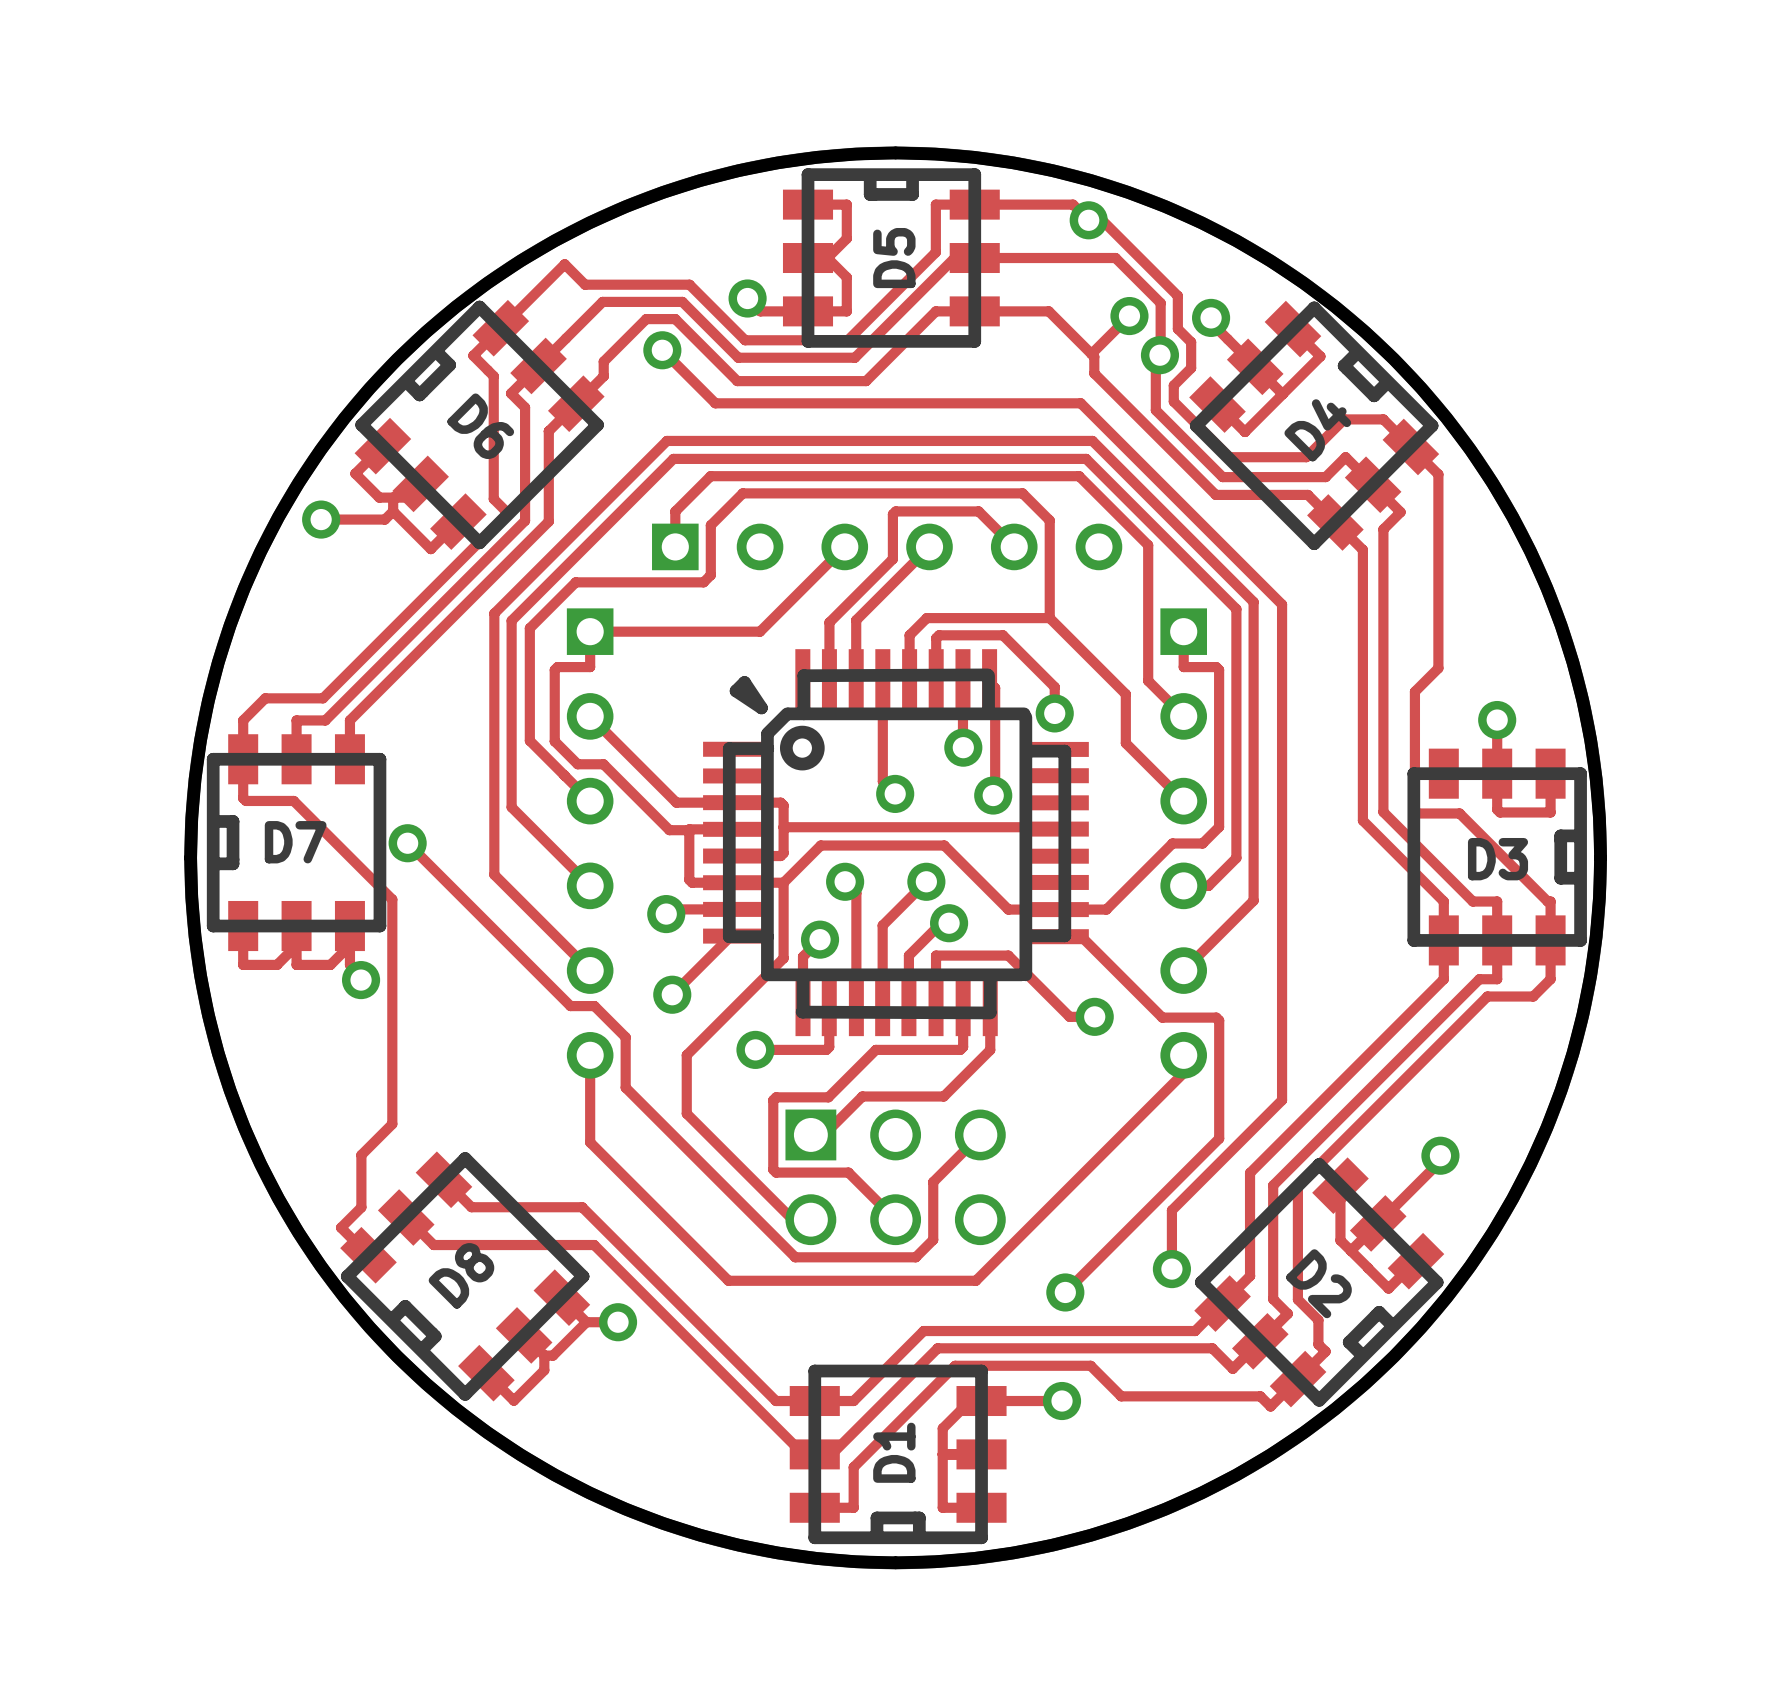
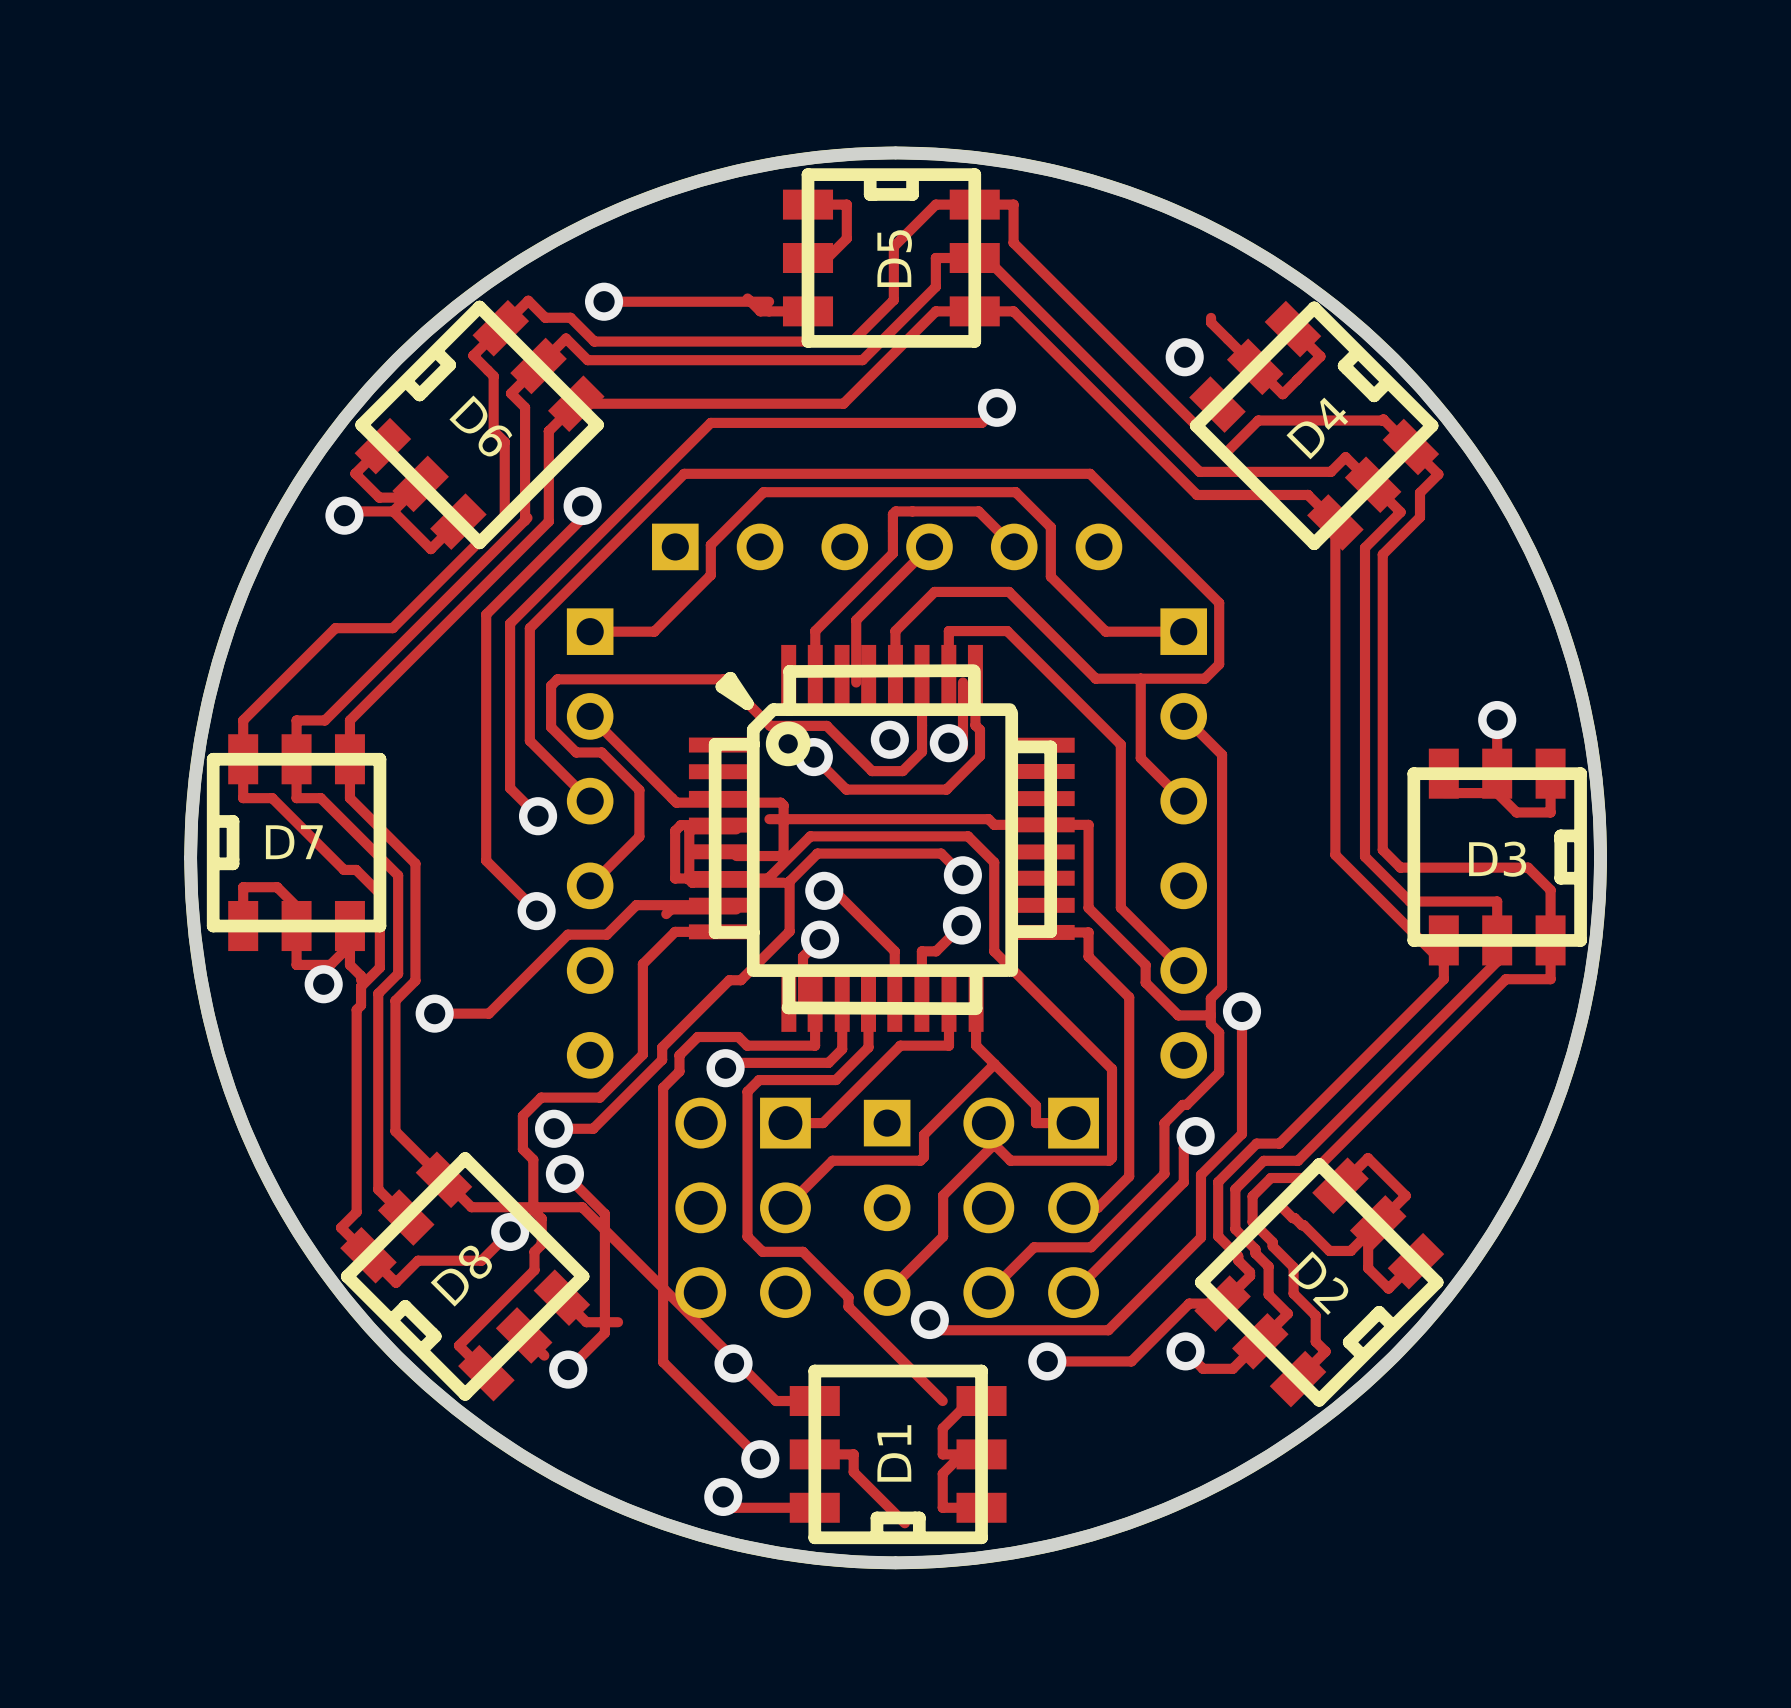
track: (935, 204) (935, 252) (847, 340) (745, 340) (689, 284) (585, 284) (564, 264) (528, 300) -> (935, 204) (893, 246) (893, 300) (852, 341) (594, 341) (570, 317) (545, 317) (528, 300)
track: (1013, 204) (1073, 204) (1088, 220) (1102, 220) (1177, 295) (1177, 328) (1191, 342) (1191, 368) (1173, 385) (1173, 401) (1229, 457) (1306, 457) (1344, 419) (1383, 419) (1410, 446) -> (1013, 204) (1013, 242) (1222, 452) (1226, 452) (1258, 420) (1383, 419) (1410, 446)
via: (1088, 220) -> none
track: (827, 258) (846, 277) (846, 311) (808, 311) -> none
track: (954, 258) (854, 357) (738, 357) (682, 301) -> (954, 258) (935, 258) (935, 286) (862, 360) (587, 360) (566, 338)
track: (985, 258) (1115, 258) (1160, 303) (1160, 354) (1155, 359) (1155, 410) (1222, 477) (1325, 477) (1330, 471) -> (985, 258) (1199, 471) (1330, 471)
via: (747, 298) -> none
track: (604, 301) (566, 338) -> none
via: none -> (604, 301)
track: (1013, 311) (1048, 311) (1094, 356) (1094, 373) (1215, 494) -> (1013, 311) (1197, 494) (1215, 494)
track: (1129, 316) (1091, 354) -> none
via: (1129, 316) -> none
via: (1211, 317) -> none
track: (662, 350) (715, 403) (1080, 403) (1282, 604) (1282, 1100) (1171, 1210) (1171, 1269) -> none
via: (662, 350) -> none
via position: (1159, 355) -> (1184, 357)
track: (866, 381) (737, 381) (675, 319) (646, 319) (603, 361) (603, 376) (576, 403) -> (866, 381) (843, 403) (576, 403)
track: (1282, 394) (1245, 431) (1217, 404) -> none
track: none -> (996, 407) (981, 422) (710, 422) (510, 623) (510, 788) (538, 816)
via: none -> (996, 407)
track: (493, 430) (493, 499) (505, 511) (505, 515) (323, 698) (265, 698) -> (493, 430) (504, 442) (504, 516) (392, 628) (335, 628) (265, 698)
track: (1438, 474) (1438, 668) (1414, 691) (1414, 810) (1417, 813) (1459, 813) (1547, 901) (1550, 901) -> (1438, 474) (1420, 492) (1420, 517) (1382, 554) (1382, 849) (1400, 867) (1528, 867) (1550, 890) (1550, 901)
track: (393, 497) (393, 511) (384, 519) (321, 519) -> none
track: none -> (406, 497) (393, 511) (348, 511) (344, 515)
track: none -> (582, 506) (582, 518) (486, 614) (486, 860) (536, 911)
via: none -> (582, 506)
via position: (321, 519) -> (344, 515)
track: (1335, 522) (1362, 549) (1362, 820) (1443, 901) (1443, 940) -> (1335, 522) (1335, 854) (1443, 963)
track: (1383, 529) (1383, 812) (1472, 901) -> (1383, 529) (1365, 547) (1365, 856) (1409, 901) (1472, 901)
track: (710, 544) (710, 525) (742, 493) (1022, 493) (1049, 520) (1049, 618) -> (710, 544) (763, 492) (1015, 492) (1050, 527) (1050, 576) (1105, 631) (1183, 631)
track: (675, 546) (675, 511) (710, 476) (1079, 476) (1148, 545) (1148, 680) (1183, 716) -> none
track: (844, 546) (760, 631) (654, 631) -> none
track: (892, 553) (892, 559) (829, 622) (829, 682) -> (892, 553) (815, 631) (815, 678)
track: (575, 582) (703, 582) -> (654, 631) (703, 582)
track: none -> (575, 582) (684, 473) (1090, 473) (1219, 602) (1219, 664) (1204, 678) (1095, 678) (1009, 591) (934, 591) (895, 631) (895, 678)
track: (1049, 618) (1125, 694) (1125, 743) (1140, 758) -> (1140, 678) (1140, 758)
track: (1049, 618) (926, 618) (909, 635) (909, 682) -> none
track: (590, 631) (590, 667) (557, 667) (554, 669) (554, 741) (577, 764) (603, 764) (669, 830) (689, 830) -> none
track: (1183, 631) (1183, 667) (1216, 667) (1219, 669) (1219, 827) (1202, 843) (1172, 843) (1106, 909) (1008, 909) (944, 845) (820, 845) (783, 882) (783, 958) (686, 1055) (686, 1113) (792, 1219) (810, 1219) -> none
track: none -> (975, 678) (975, 725) (980, 729) (980, 756) (946, 789) (846, 789) (813, 757)
track: (882, 682) (882, 781) (895, 793) -> none
track: (936, 682) (936, 638) (939, 635) (1002, 635) (1054, 687) (1054, 713) -> none
track: (989, 682) (995, 688) (995, 793) (993, 795) -> none
via: (1054, 713) -> none
via: none -> (889, 739)
via position: (963, 747) -> (948, 743)
via: none -> (813, 757)
track: none -> (349, 759) (349, 798) (415, 863) (415, 980) (395, 1000) (395, 1131) (444, 1179)
via: (895, 793) -> none
track: (1497, 793) (1497, 809) (1500, 812) (1516, 812) -> (1443, 793) (1497, 793) (1516, 812)
via: (993, 795) -> none
track: (243, 798) (246, 800) (293, 800) (392, 899) (392, 1124) (361, 1155) (361, 1207) (356, 1212) -> (243, 798) (272, 798) (344, 869) (356, 869) (379, 893) (379, 967) (361, 986) (361, 1005) (356, 1009) (356, 1212)
via: none -> (538, 816)
track: none -> (769, 819) (988, 819) (994, 824) (1088, 824) (1088, 907) (1145, 965) (1145, 982) (1178, 1015) (1210, 1015)
track: none -> (722, 825) (680, 825) (675, 830) (675, 878) (769, 878) (810, 836) (968, 836) (994, 862) (994, 951) (1112, 1069) (1112, 1157) (1109, 1160) (1010, 1160) (994, 1144)
track: (783, 827) (1053, 827) (1055, 829) -> none
part position: (895, 842) -> (881, 838)
track: (407, 843) (570, 1006) (594, 1006) (625, 1037) (625, 1087) (795, 1257) (915, 1257) (933, 1239) (933, 1182) (980, 1134) -> none
via: (407, 843) -> none
track: none -> (962, 875) (941, 853) (817, 853) (789, 881) (789, 931) (740, 980) (729, 980) (662, 1047) (662, 1059) (593, 1128) (554, 1128)
via: none -> (962, 875)
track: (845, 881) (856, 893) (856, 1002) -> none
via position: (845, 881) -> (824, 890)
track: (926, 881) (882, 925) (882, 1002) -> none
via: (926, 881) -> none
track: (590, 885) (511, 807) (511, 620) (673, 458) (1086, 458) (1236, 609) (1236, 858) (1208, 885) (1183, 885) -> (590, 885) (639, 836) (639, 790) (601, 752) (576, 752) (551, 727) (551, 685) (557, 679) (723, 679) (770, 725) (826, 725) (872, 771) (902, 771) (922, 751) (922, 678)
track: none -> (824, 890) (834, 890) (894, 951) (894, 998)
track: none -> (722, 905) (636, 905) (606, 934) (567, 934) (488, 1013) (434, 1013)
via: none -> (536, 911)
via: (666, 914) -> none
track: (949, 923) (941, 923) (908, 955) (908, 1002) -> none
via position: (949, 923) -> (961, 925)
track: none -> (961, 925) (936, 951) (921, 951) (921, 998)
track: (243, 926) (243, 964) (277, 964) (296, 945) -> (243, 926) (243, 887) (277, 887) (296, 906)
track: none -> (1041, 932) (1088, 932) (1088, 956) (1129, 997) (1129, 1176) (1097, 1207) (1073, 1207)
track: (736, 936) (730, 936) (672, 994) -> none
track: (1055, 936) (1081, 936) (1162, 1017) (1216, 1017) (1219, 1020) (1219, 1032) -> (1183, 716) (1222, 754) (1222, 987) (1210, 998) (1210, 1024) (1219, 1032)
track: (1497, 961) (1497, 979) (1479, 979) (1273, 1185) (1273, 1299) -> (1497, 961) (1298, 1160) (1263, 1160) (1235, 1189) (1235, 1229) (1255, 1249) (1255, 1253) (1268, 1266) (1268, 1294) (1273, 1299)
track: (590, 970) (494, 874) (494, 613) (666, 440) (1092, 440) (1253, 602) (1253, 900) (1183, 970) -> (948, 678) (948, 631) (1007, 631) (1120, 744) (1120, 907) (1183, 970)
track: (1550, 979) (1533, 996) (1487, 996) (1297, 1186) (1297, 1299) (1318, 1320) (1318, 1344) (1325, 1351) -> (1550, 979) (1505, 979) (1307, 1178) (1270, 1178) (1252, 1196) (1252, 1222) (1293, 1267) (1293, 1293) (1315, 1315) (1315, 1341) (1325, 1351)
via position: (361, 980) -> (323, 984)
via: (672, 994) -> none
track: none -> (815, 998) (815, 1045) (747, 1045) (738, 1037) (697, 1037) (679, 1055) (679, 1071) (663, 1087) (663, 1362) (760, 1459)
track: none -> (842, 998) (842, 1049) (828, 1062) (730, 1062) (725, 1068)
track: none -> (868, 998) (868, 1047) (835, 1080) (759, 1080) (747, 1091) (747, 1236) (762, 1251) (802, 1251) (848, 1297) (848, 1306) (942, 1401)
track: none -> (948, 998) (948, 1045) (900, 1045) (823, 1123) (785, 1123)
track: none -> (976, 998) (976, 1045) (1036, 1105) (1036, 1123) (1073, 1123)
track: (829, 1002) (829, 1047) (826, 1049) (755, 1049) -> none
track: (936, 1002) (936, 955) (1008, 955) (1069, 1016) (1094, 1016) -> none
track: (963, 1002) (963, 1047) (960, 1049) (875, 1049) (828, 1097) (776, 1097) (773, 1100) (773, 1169) (776, 1172) (848, 1172) (895, 1219) -> none
track: (990, 1002) (990, 1050) (943, 1096) (862, 1096) (823, 1134) (810, 1134) -> none
track: none -> (1241, 1011) (1241, 1133) (1200, 1174) (1200, 1237) (1108, 1330) (940, 1330) (929, 1320)
via: none -> (1241, 1011)
via: none -> (434, 1013)
via: (1094, 1016) -> none
via position: (755, 1049) -> (725, 1068)
track: (590, 1055) (590, 1142) (728, 1280) (975, 1280) (1183, 1073) (1183, 1055) -> none
track: none -> (994, 1064) (924, 1134) (924, 1157) (920, 1160) (832, 1160) (785, 1207)
track: (1219, 1072) (1219, 1138) (1065, 1292) -> (1219, 1072) (1186, 1104) (1182, 1104) (1164, 1123) (1164, 1173) (1091, 1247) (1034, 1247) (988, 1292)
part footprint: [785, 1109, 1006, 1246] -> [863, 1099, 911, 1316]
via: none -> (554, 1128)
track: none -> (1195, 1136) (1183, 1147) (1183, 1182) (1073, 1292)
via: none -> (1195, 1136)
track: (1279, 1143) (1250, 1173) (1250, 1272) -> (1279, 1143) (1256, 1143) (1218, 1182) (1218, 1236) (1238, 1256) (1238, 1260) (1250, 1272)
track: none -> (994, 1144) (943, 1195) (943, 1236) (887, 1292)
track: (1440, 1155) (1440, 1161) (1405, 1195) -> (1340, 1185) (1367, 1158) (1405, 1195)
via: (1440, 1155) -> none
track: none -> (564, 1174) (604, 1214) (604, 1332) (568, 1369)
via: none -> (564, 1174)
track: (1340, 1185) (1340, 1240) (1368, 1268) -> (1364, 1237) (1368, 1240) (1368, 1268)
part: none -> (743, 1207)
part: none -> (1031, 1207)
track: none -> (1283, 1209) (1303, 1225) (1329, 1250) (1350, 1250)
track: (406, 1217) (433, 1245) (594, 1245) (803, 1454) (814, 1454) -> (406, 1217) (378, 1189) (378, 993) (398, 973) (398, 875) (320, 798) (296, 798) (296, 759)
track: none -> (510, 1231) (481, 1260) (418, 1260) (396, 1282) (368, 1255)
via: none -> (510, 1231)
via: (1171, 1269) -> none
via: (1065, 1292) -> none
track: (1222, 1303) (1195, 1331) (923, 1331) (853, 1401) (814, 1401) -> (1222, 1303) (1189, 1303) (1131, 1361) (1047, 1361)
via: none -> (929, 1320)
track: (586, 1322) (553, 1355) (544, 1355) (544, 1370) (513, 1400) (486, 1373) -> (722, 931) (675, 931) (642, 964) (642, 1054) (599, 1097) (541, 1097) (522, 1115) (522, 1149) (533, 1159) (533, 1210) (541, 1218) (541, 1244) (534, 1251) (534, 1270) (459, 1345) (486, 1373)
via: (618, 1322) -> none
via: none -> (1185, 1351)
via: none -> (1047, 1361)
via: none -> (733, 1363)
track: (1232, 1368) (1212, 1348) (937, 1348) (831, 1454) -> (1232, 1368) (1203, 1368) (1185, 1351)
via: none -> (568, 1369)
track: (1298, 1379) (1270, 1406) (1260, 1396) (1121, 1396) (1090, 1365) (955, 1365) (853, 1467) -> (831, 1454) (853, 1454) (853, 1467)
track: (981, 1401) (1062, 1401) -> none
via: (1062, 1401) -> none
track: (942, 1454) (942, 1473) -> (962, 1454) (942, 1473)
via: none -> (760, 1459)
track: (853, 1472) (853, 1507) (814, 1507) -> (853, 1472) (904, 1523)
track: none -> (723, 1496) (734, 1507) (814, 1507)
via: none -> (723, 1496)

